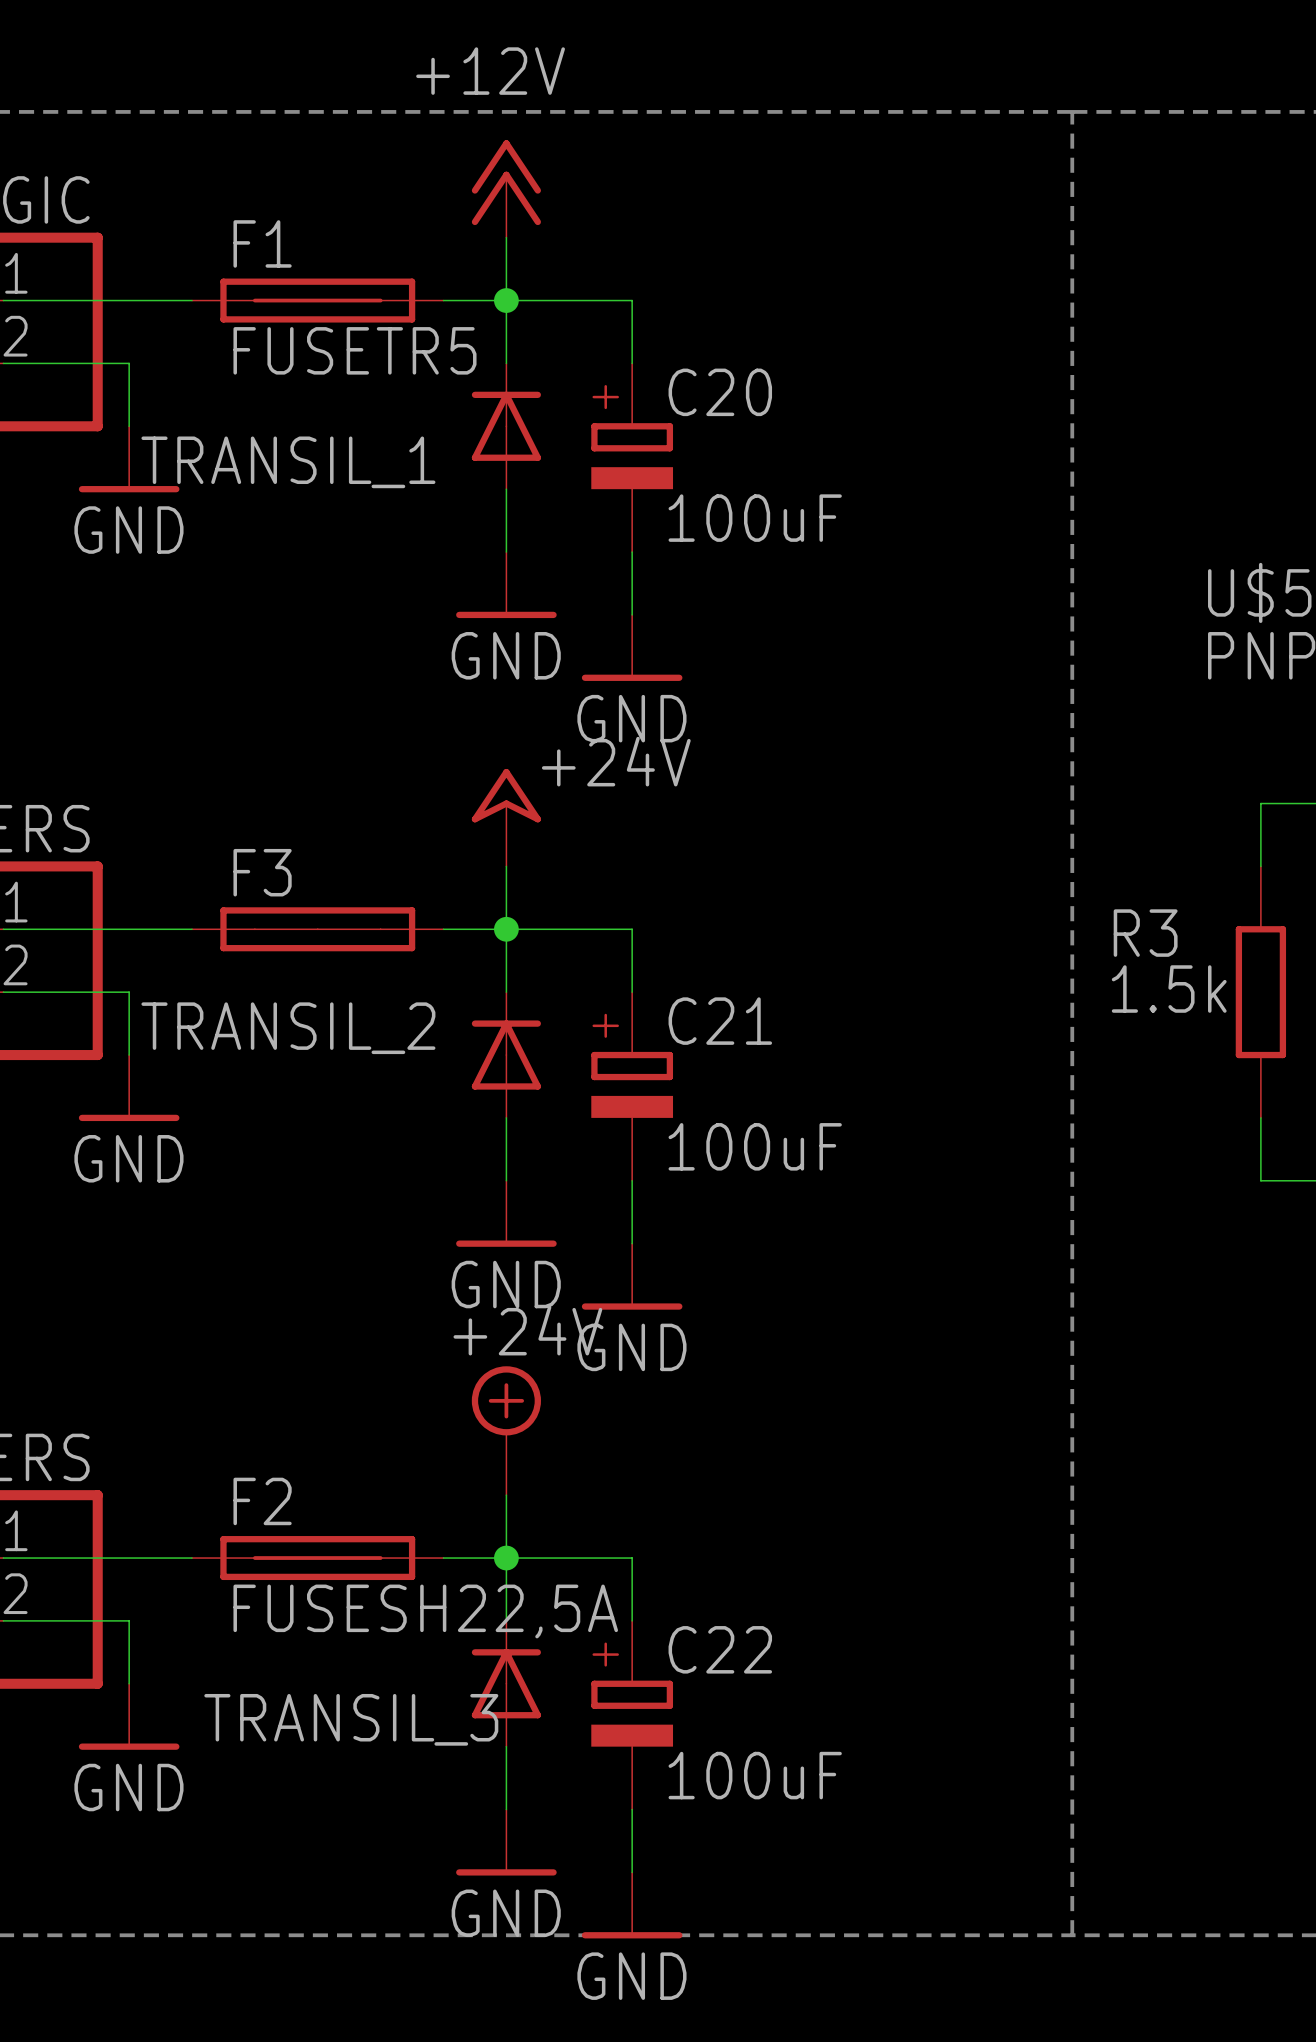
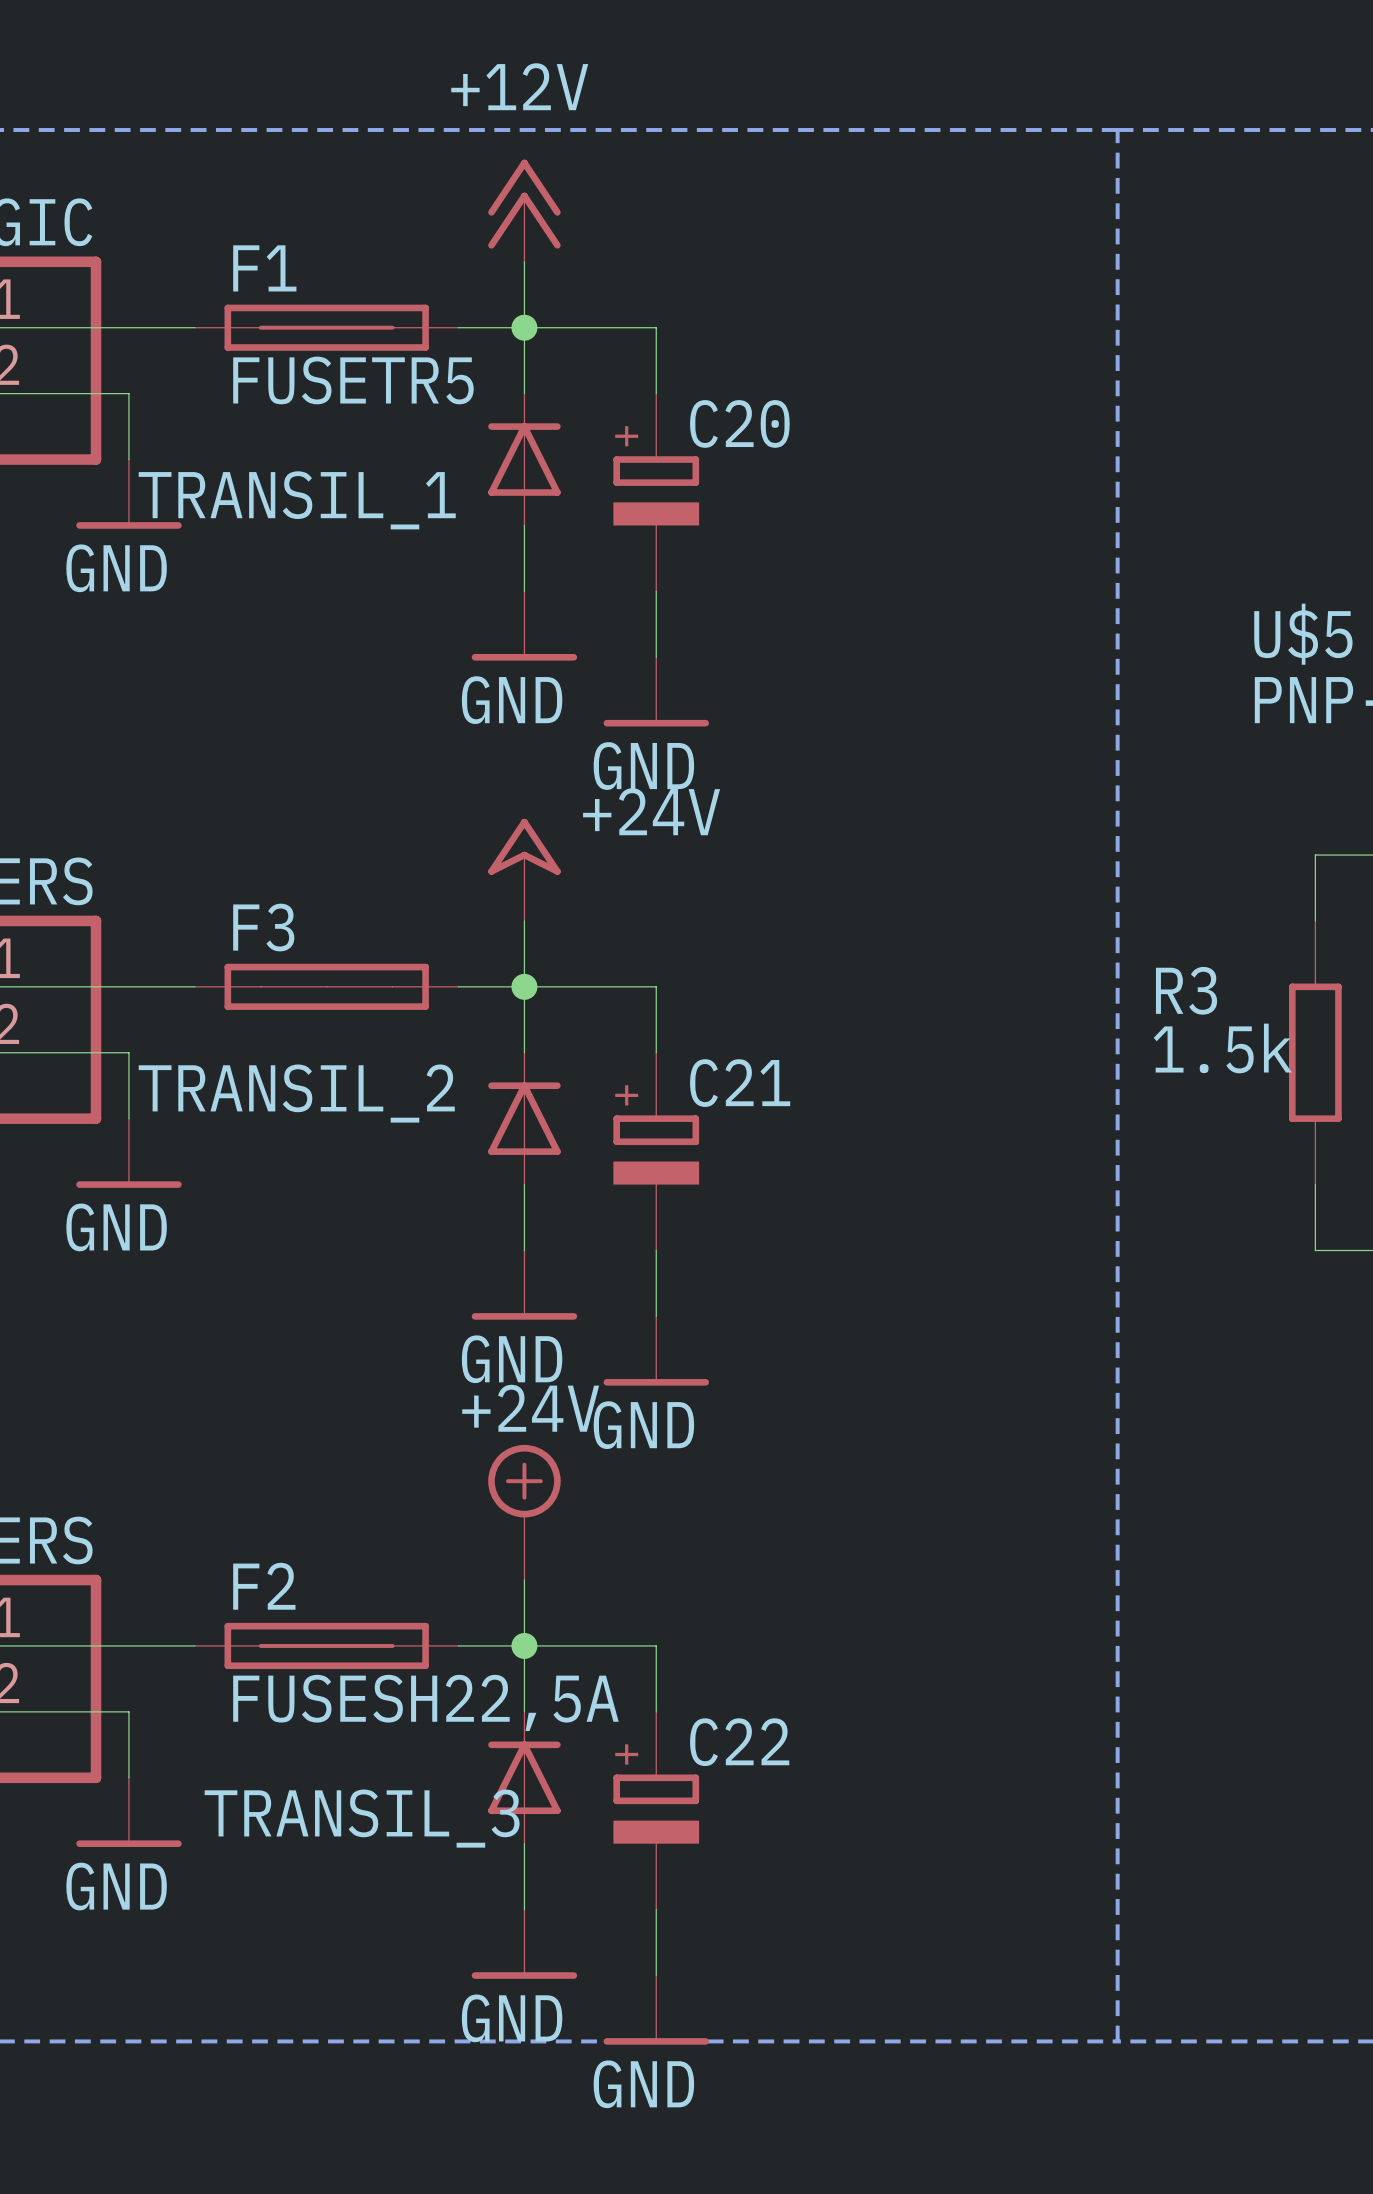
C20 value: 100uF (755, 518) -> none
C21 value: 100uF (755, 1146) -> none
C22 value: 100uF (755, 1775) -> none

